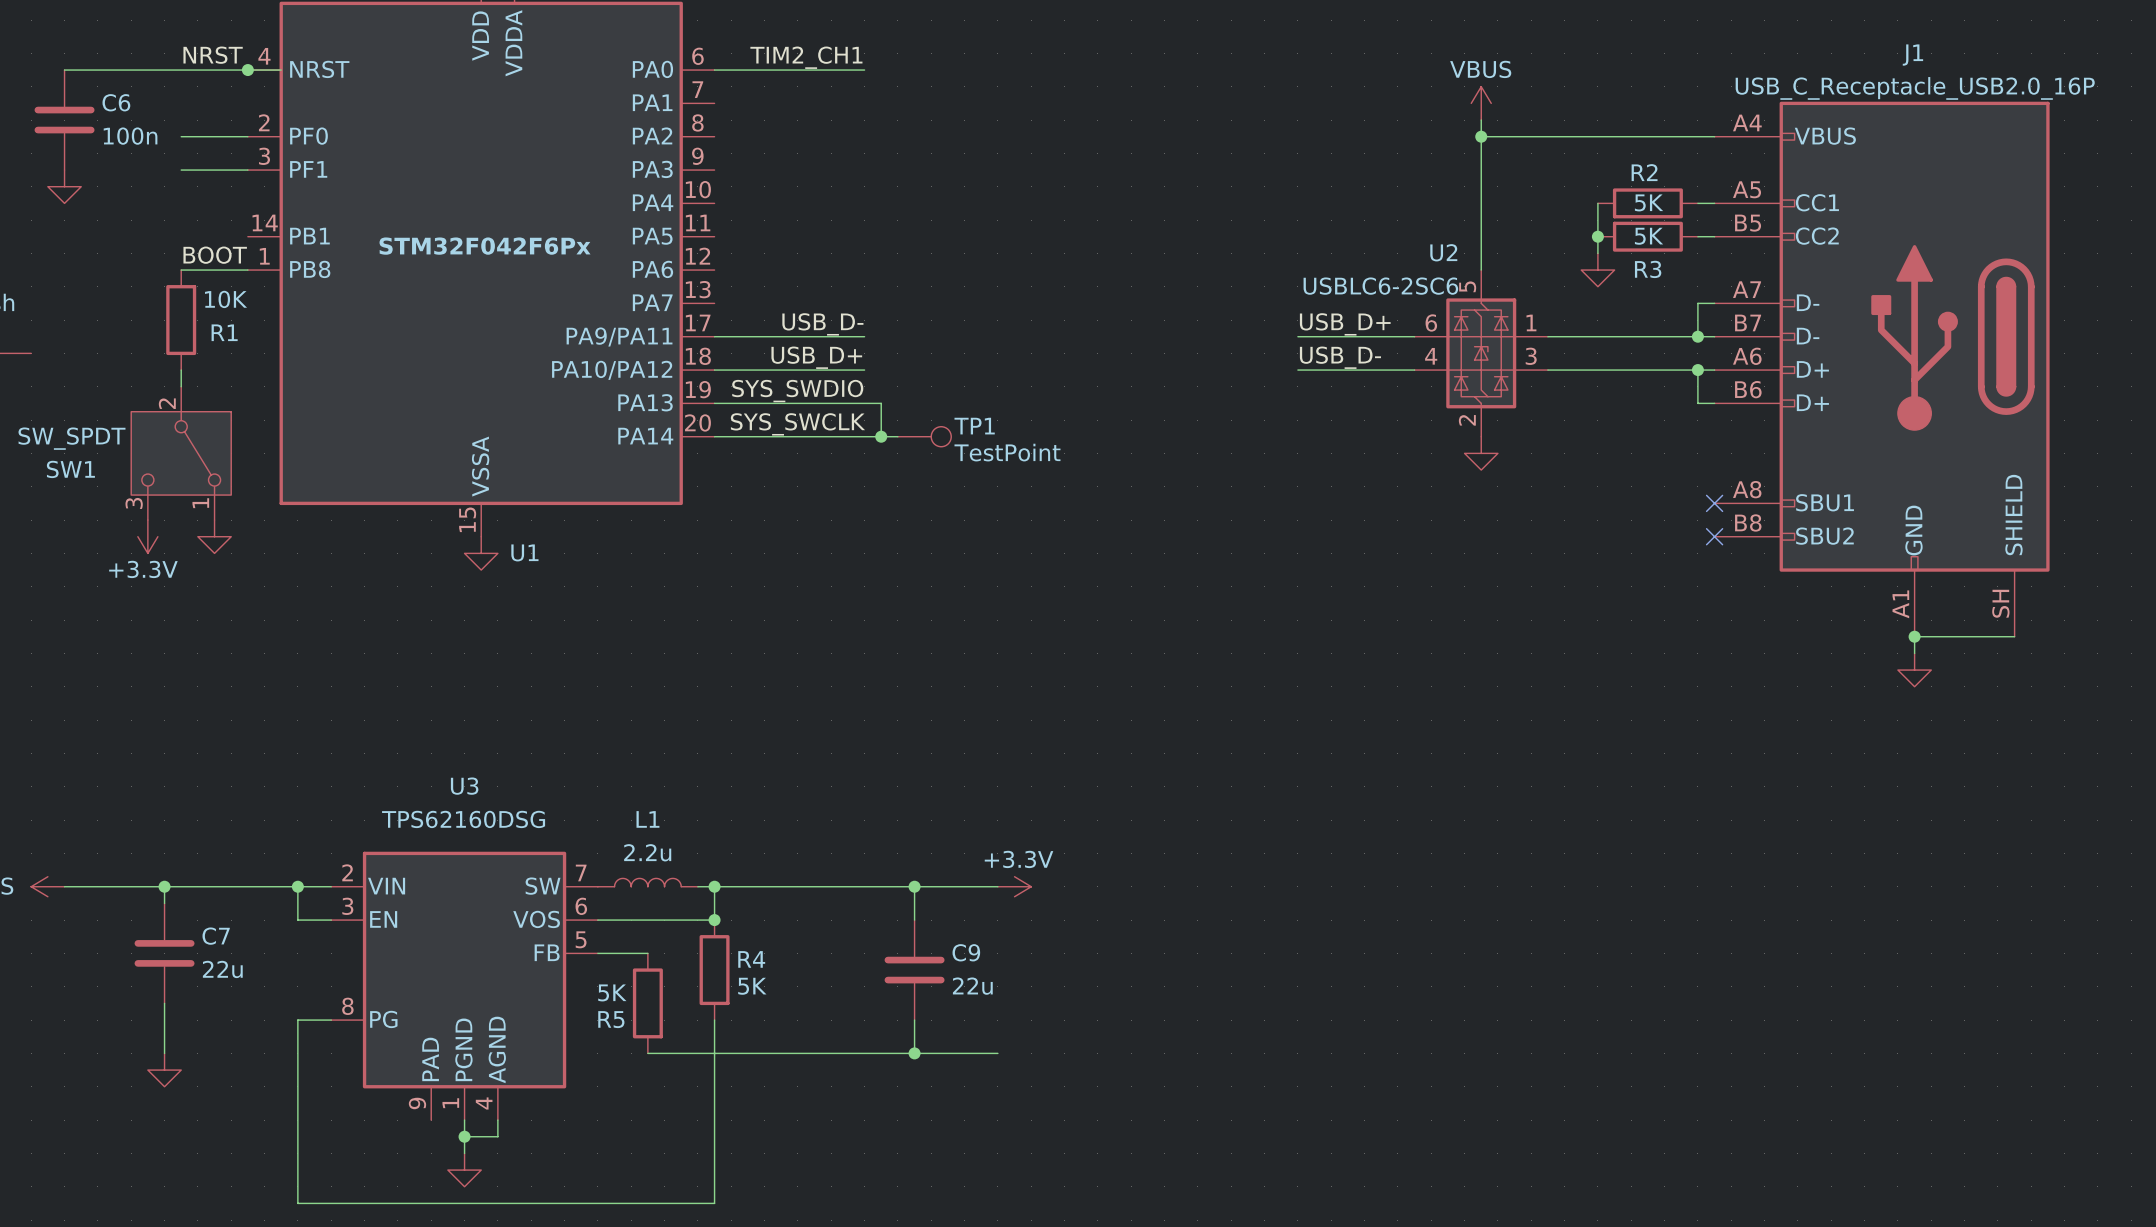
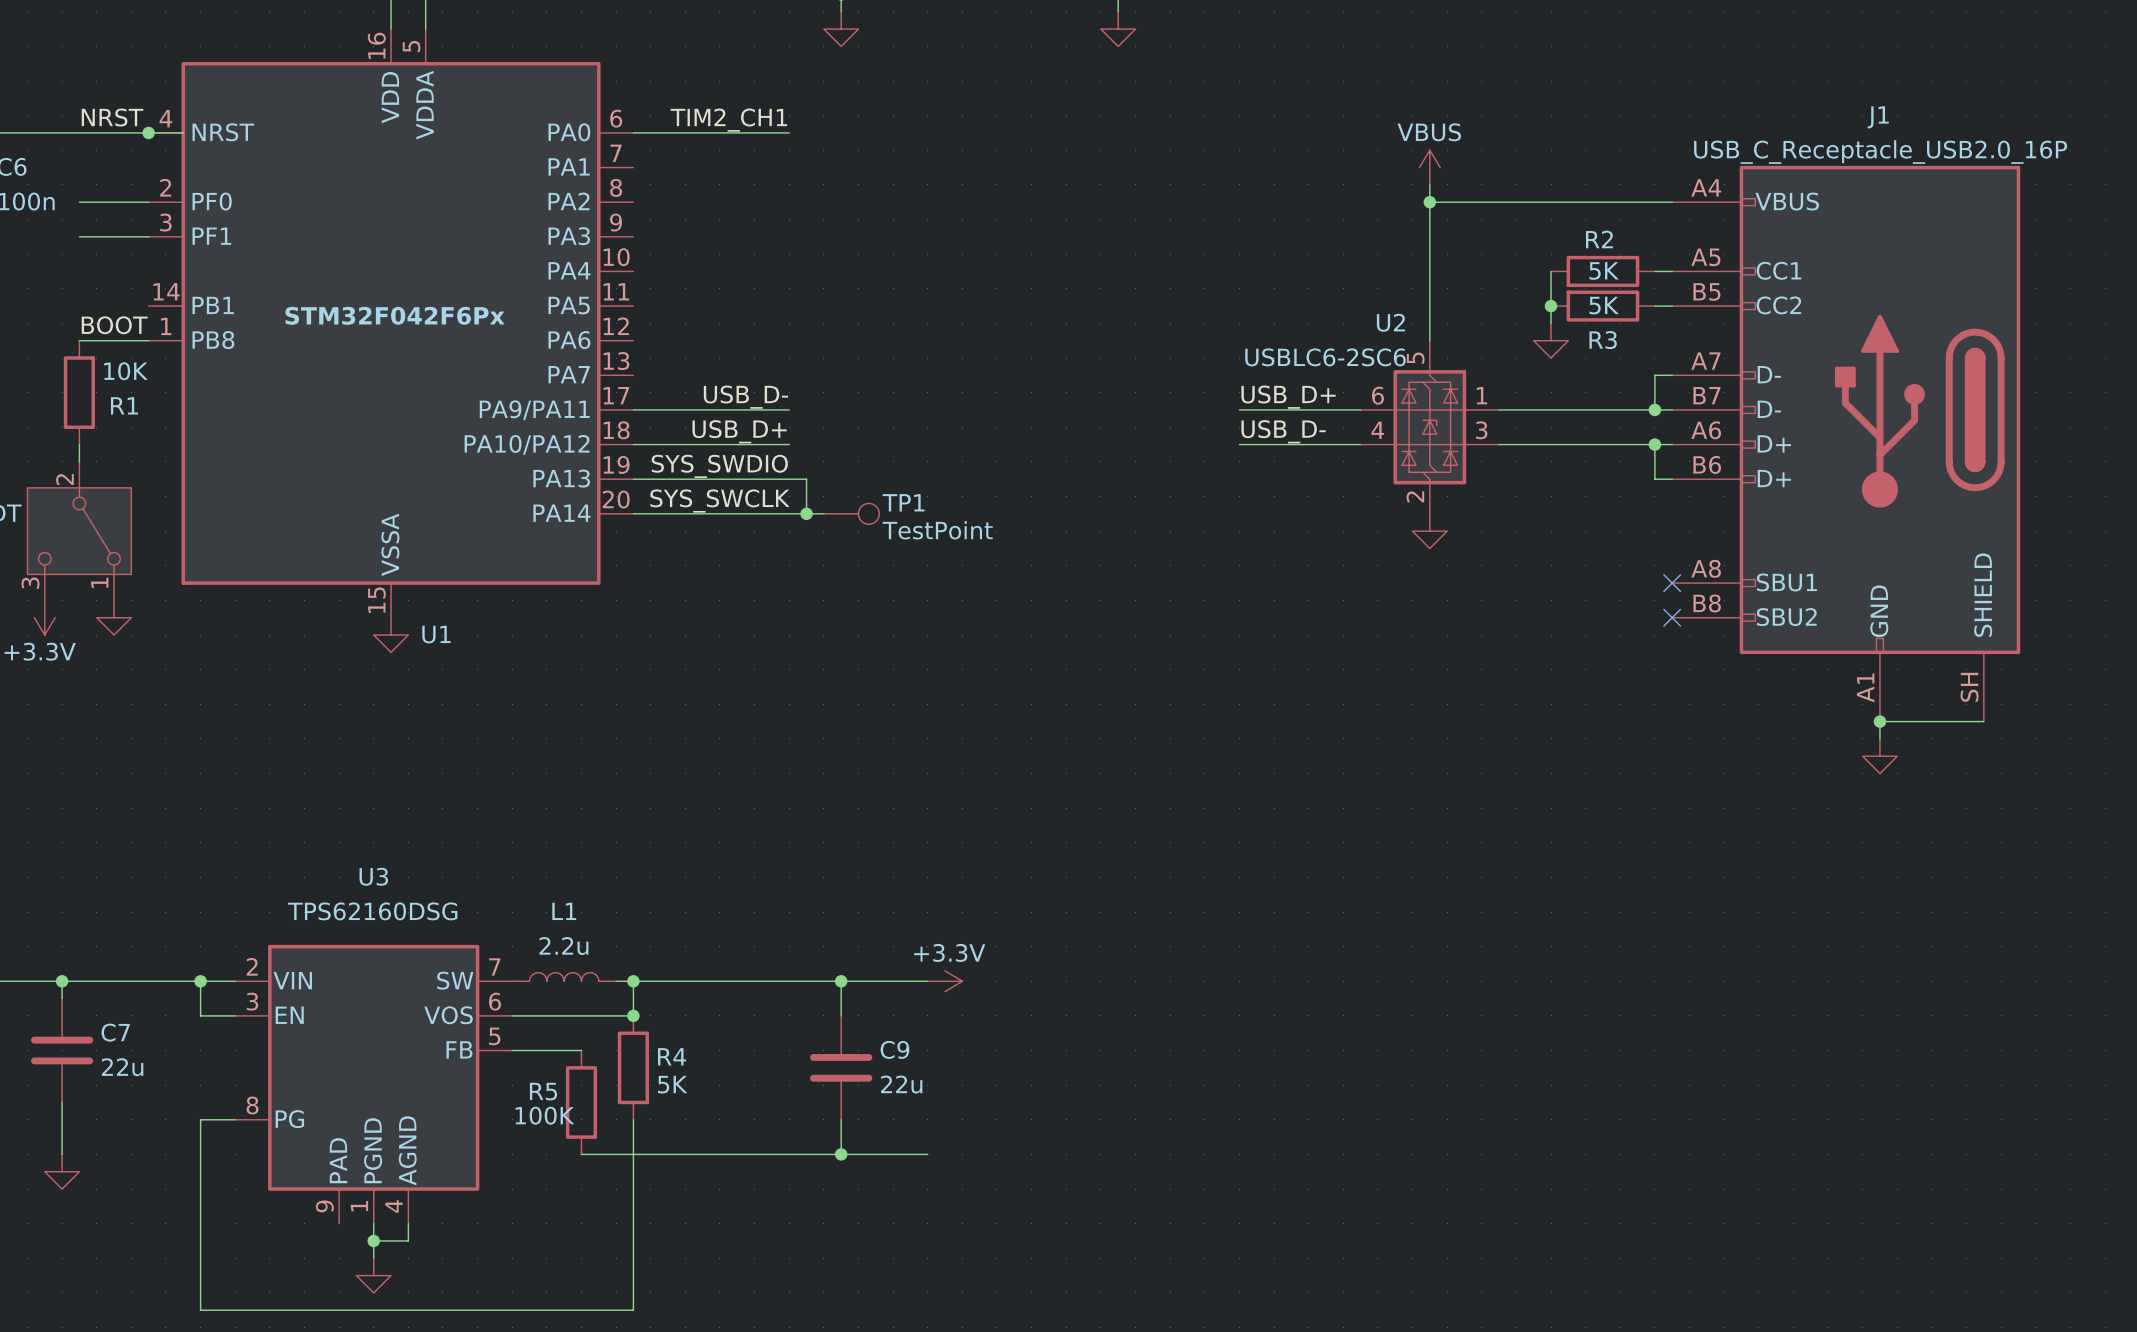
R5 value: 5K (612, 992) -> 100K (544, 1115)
R5 position: (647, 1003) -> (581, 1102)
R5 name position: R5 (611, 1019) -> R5 (543, 1091)
wire: (647, 1053) (664, 1053) -> (564, 1050) (581, 1050)

